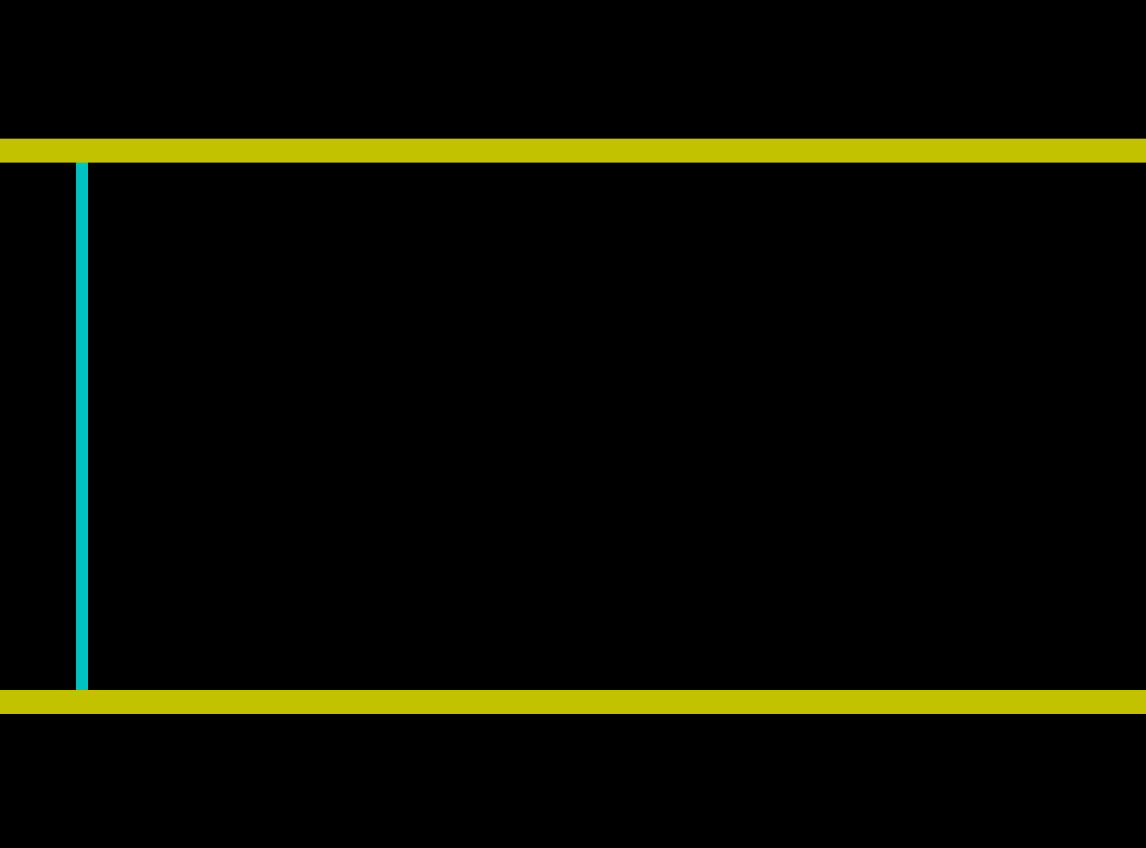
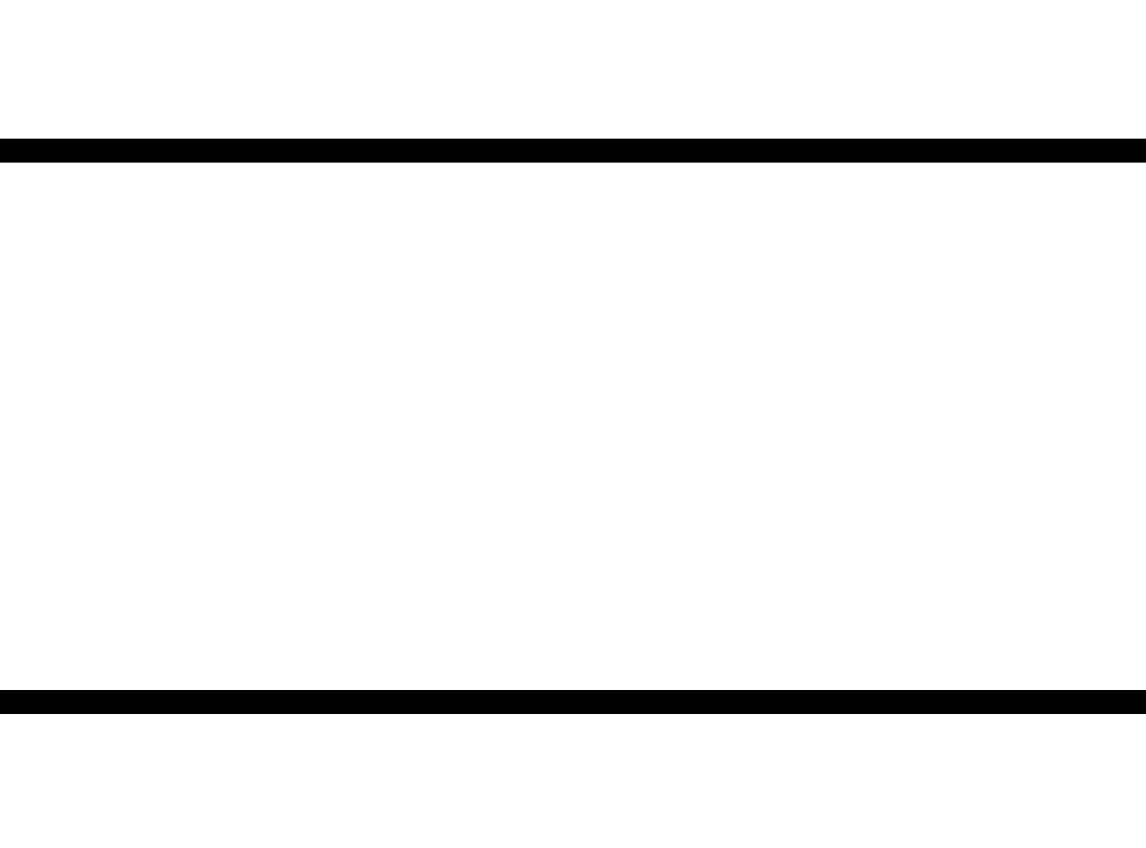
line: (82, 162) (82, 690) -> none

